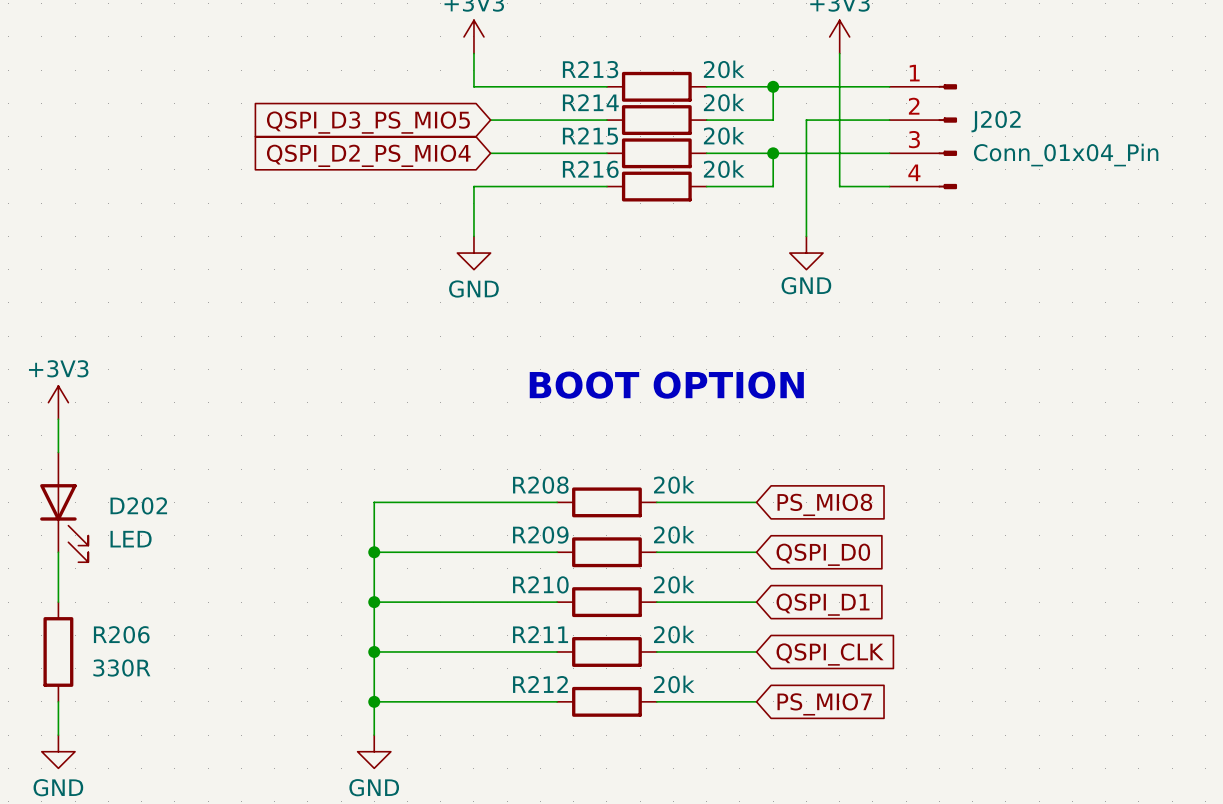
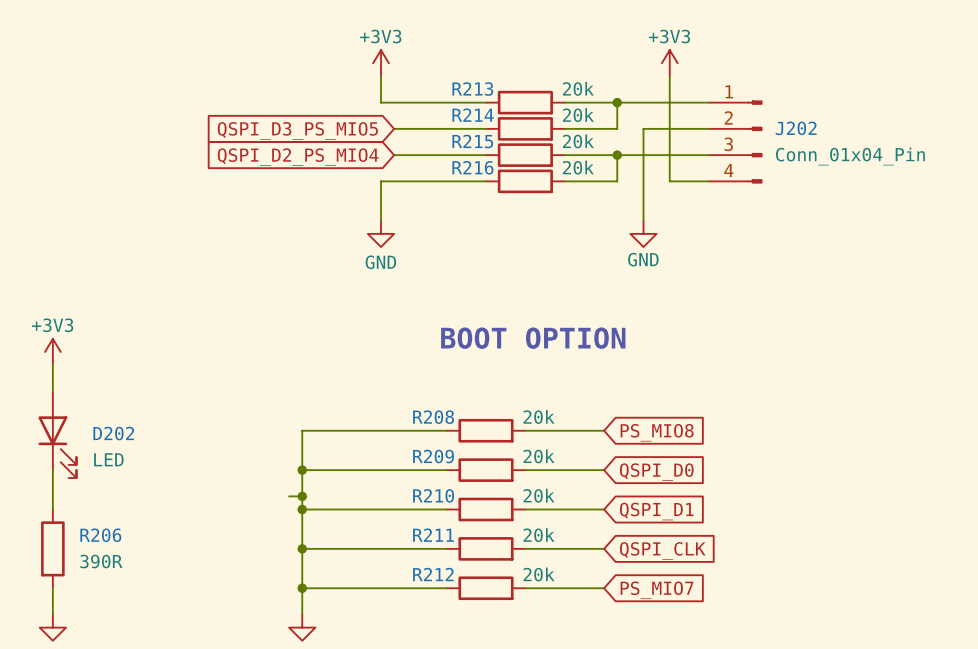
wire: none -> (289, 496) (302, 496)
junction: none -> (302, 496)
R206 value: 330R (121, 668) -> 390R (101, 561)

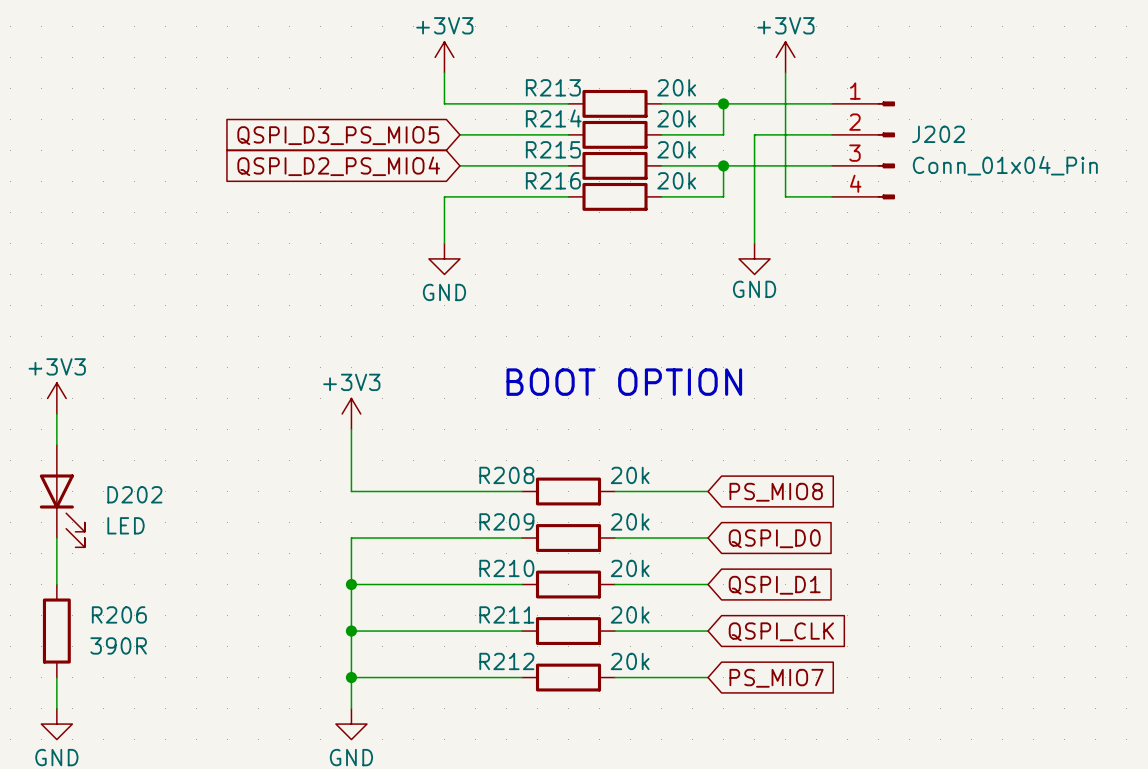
power symbol: none -> +3V3 (351, 413)
wire: (302, 430) (302, 470) -> (351, 491) (351, 429)
junction: (302, 470) -> none
wire: (289, 496) (302, 496) -> none
junction: (302, 496) -> none

